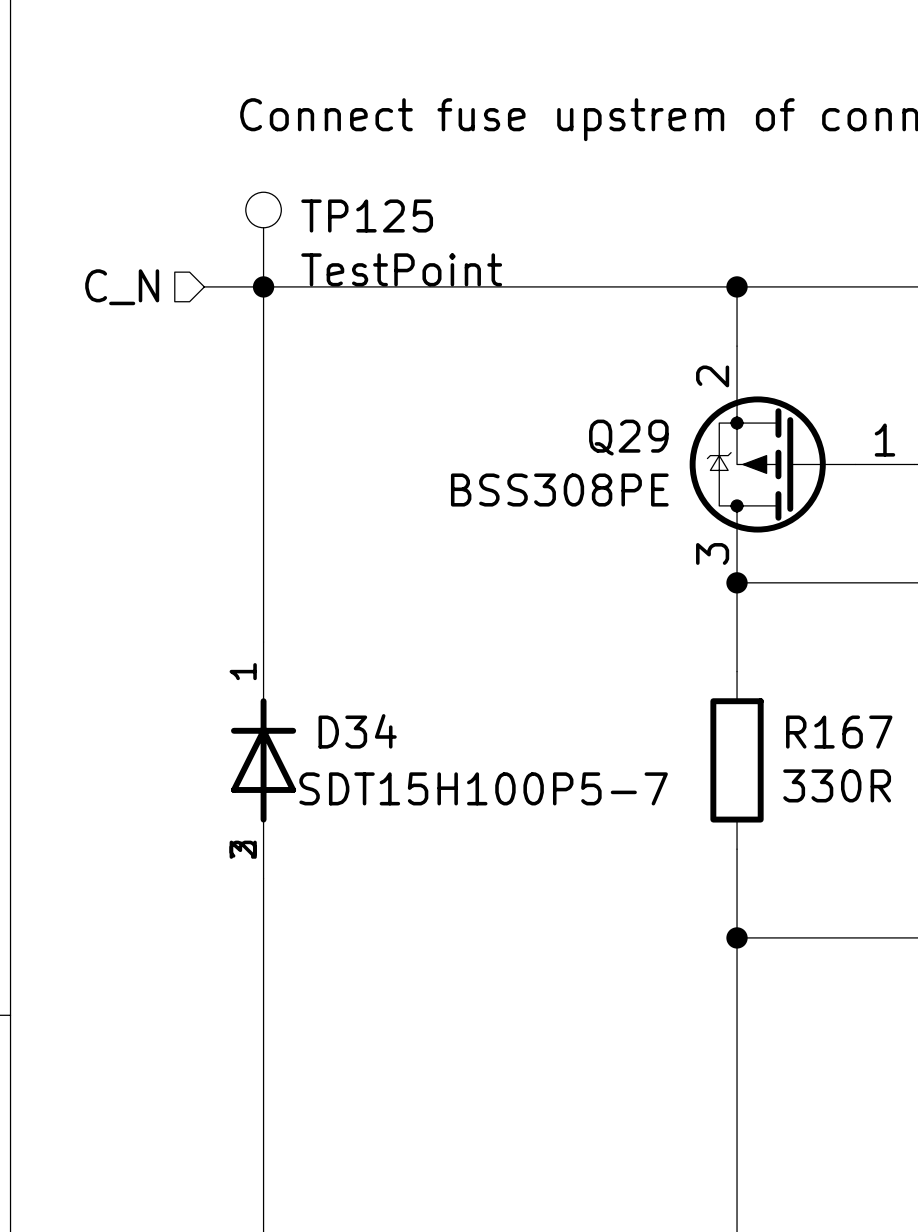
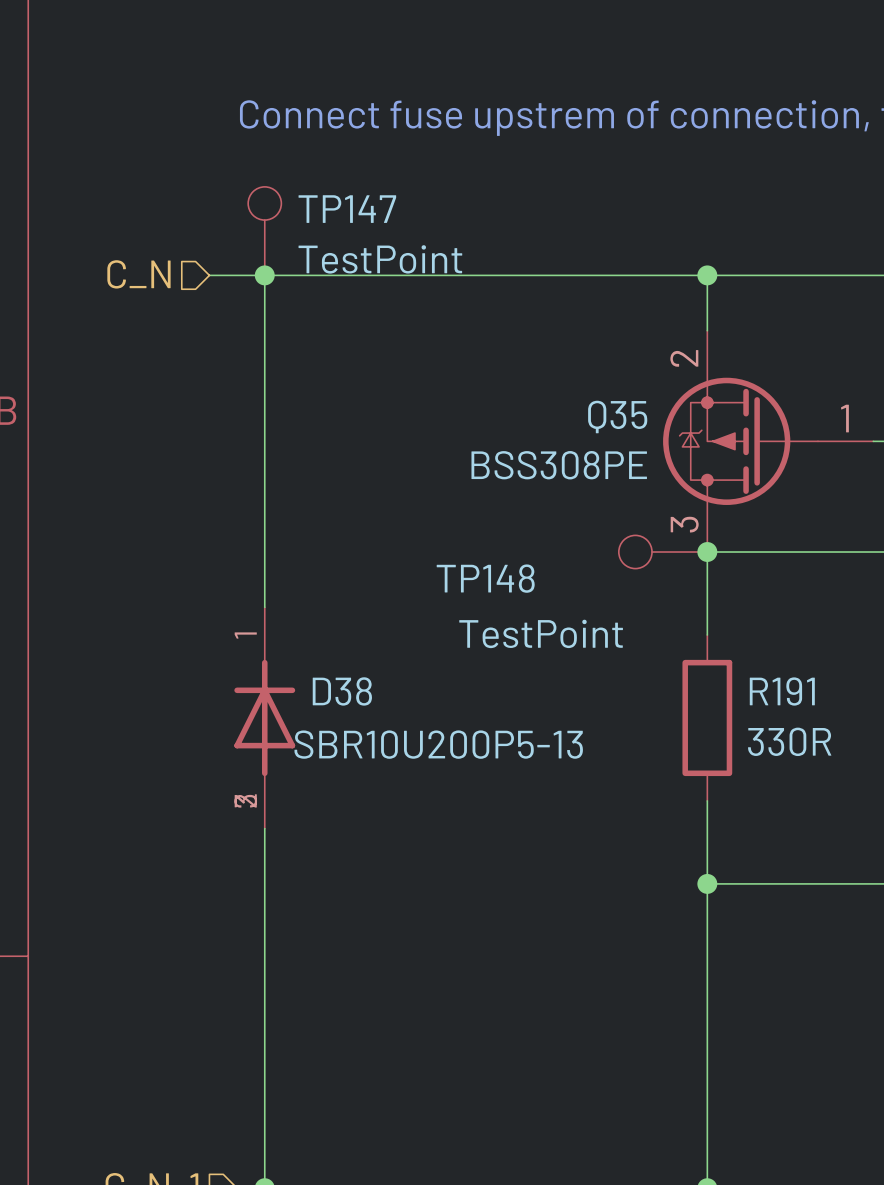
TP125 name: TP125 (367, 215) -> TP147 (347, 209)
Q29 name: Q29 (628, 437) -> Q35 (617, 416)
TP148: none -> TestPoint (663, 552)
D34 name: D34 (357, 731) -> D38 (342, 691)
R167 name: R167 (839, 732) -> R191 (782, 691)
D34 value: SDT15H100P5-7 (483, 788) -> SBR10U200P5-13 (438, 744)

